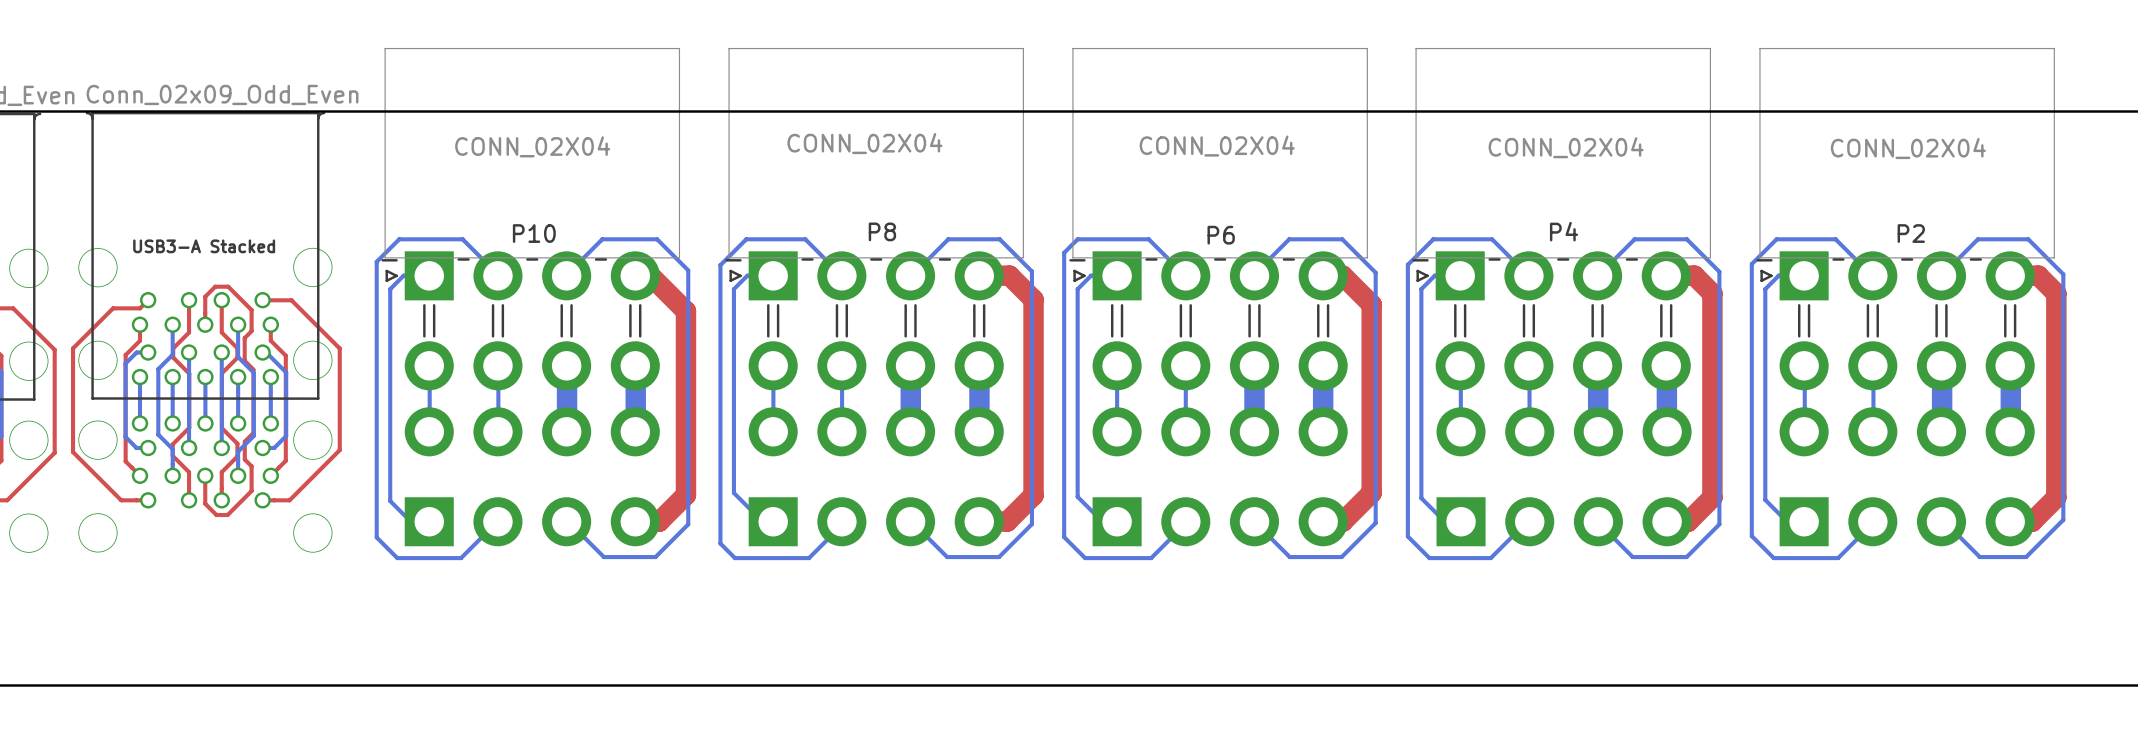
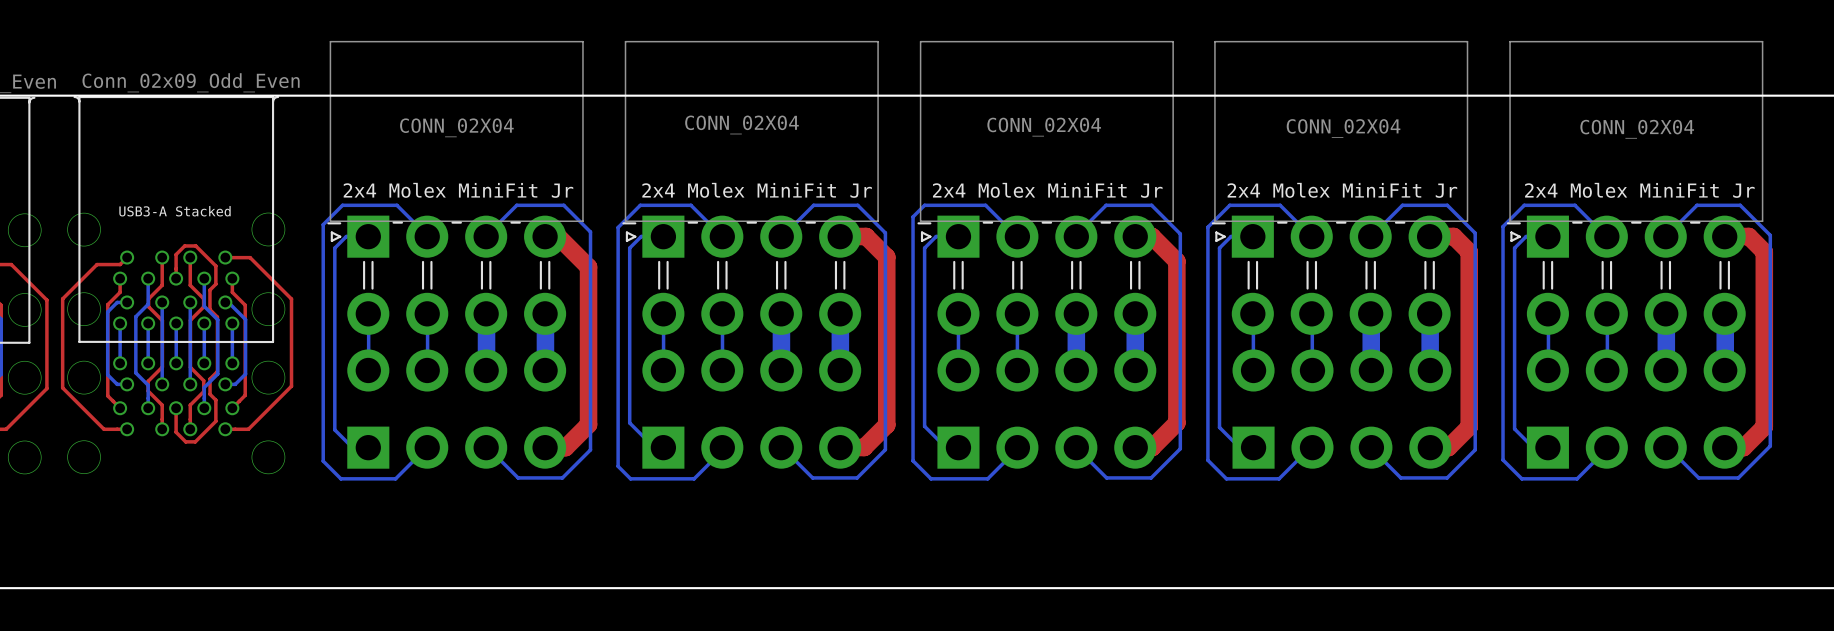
P8 name: P8 (882, 231) -> 2x4 Molex MiniFit Jr (757, 190)
P4 name: P4 (1564, 231) -> 2x4 Molex MiniFit Jr (1342, 190)
P10 name: P10 (534, 233) -> 2x4 Molex MiniFit Jr (458, 190)
P2 name: P2 (1911, 233) -> 2x4 Molex MiniFit Jr (1639, 190)
P6 name: P6 (1221, 235) -> 2x4 Molex MiniFit Jr (1047, 190)

